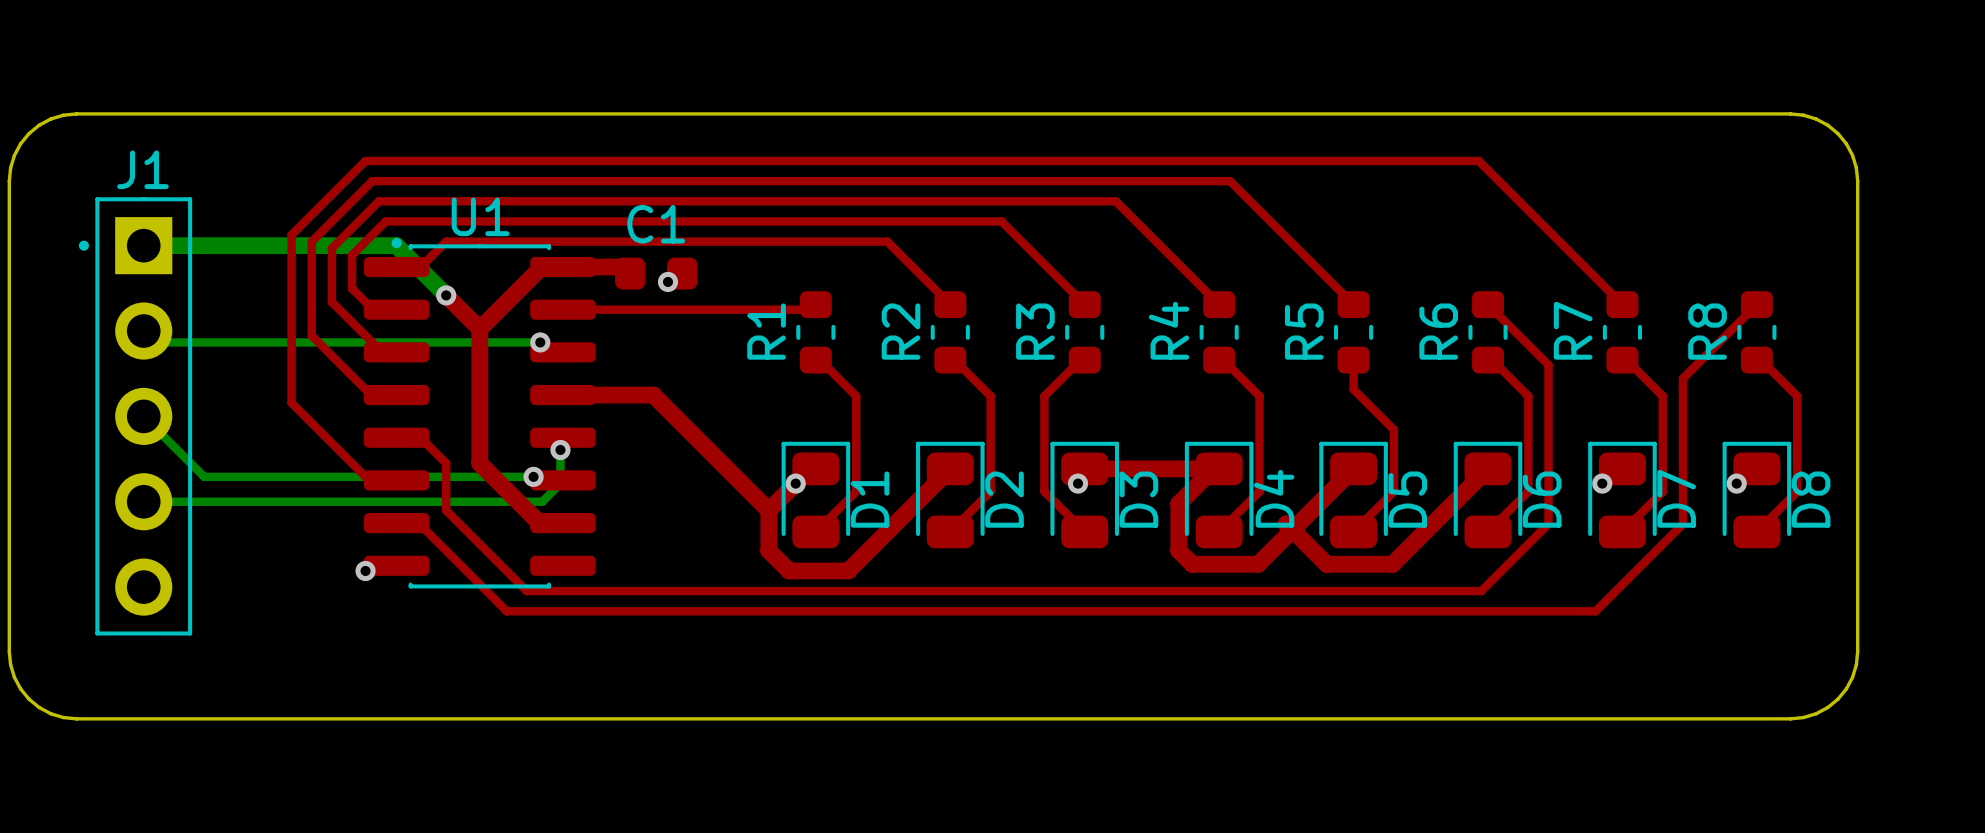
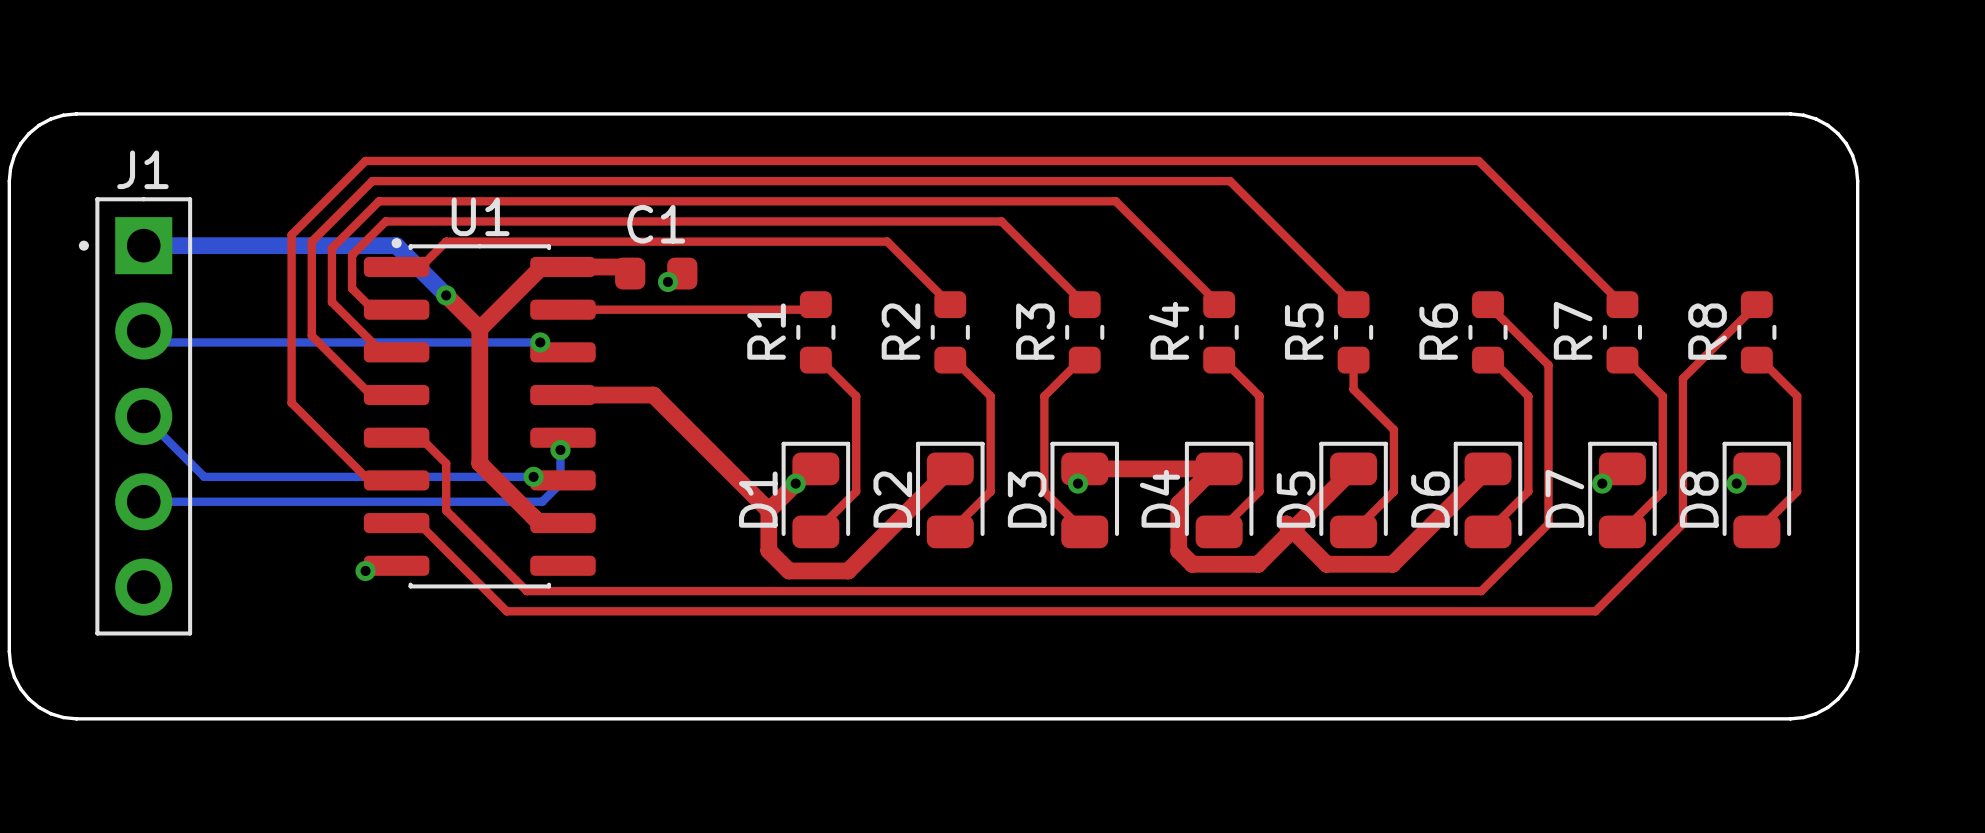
D4 name position: D4 (1274, 498) -> D4 (1160, 498)
D7 name position: D7 (1676, 498) -> D7 (1564, 498)
D1 name position: D1 (870, 499) -> D1 (758, 499)
D2 name position: D2 (1004, 499) -> D2 (892, 499)
D3 name position: D3 (1138, 499) -> D3 (1027, 499)
D5 name position: D5 (1407, 499) -> D5 (1296, 499)
D6 name position: D6 (1542, 499) -> D6 (1430, 499)
D8 name position: D8 (1811, 499) -> D8 (1699, 499)

